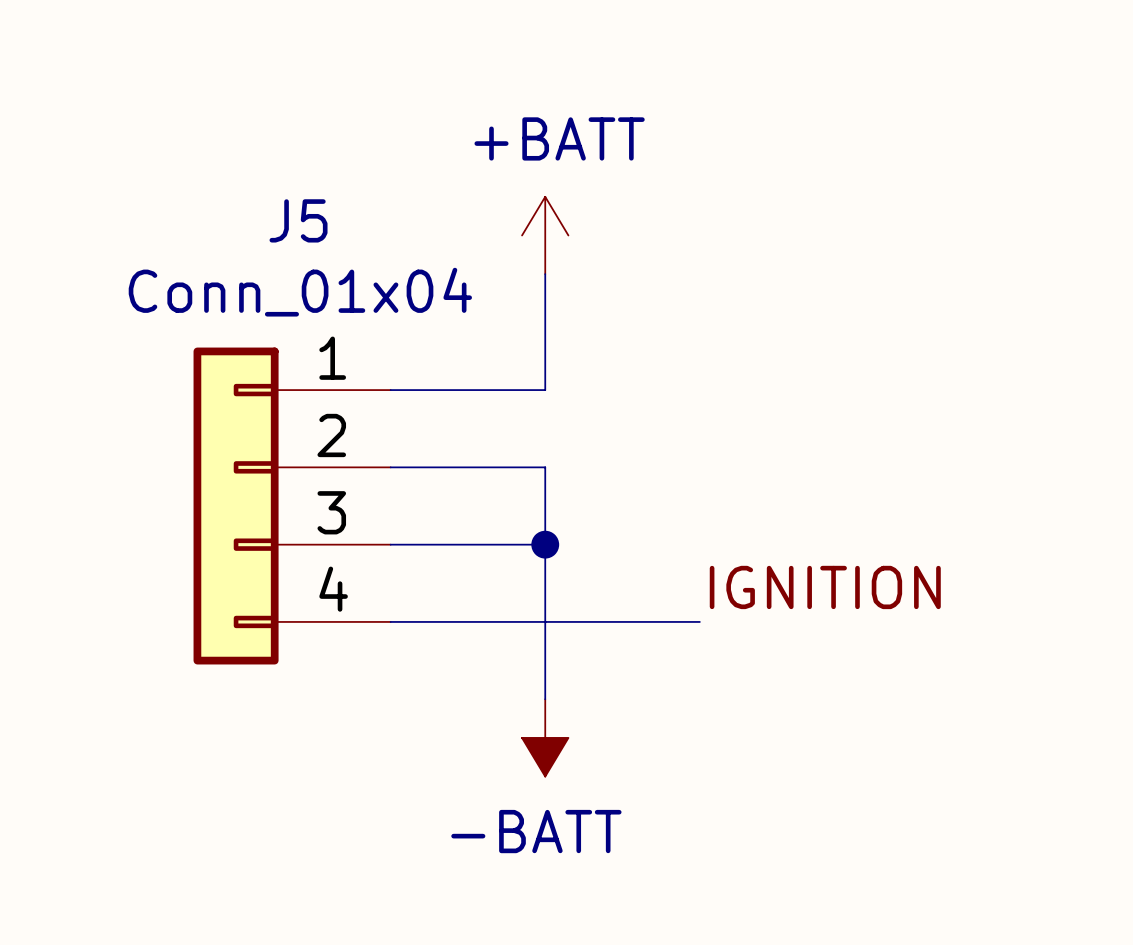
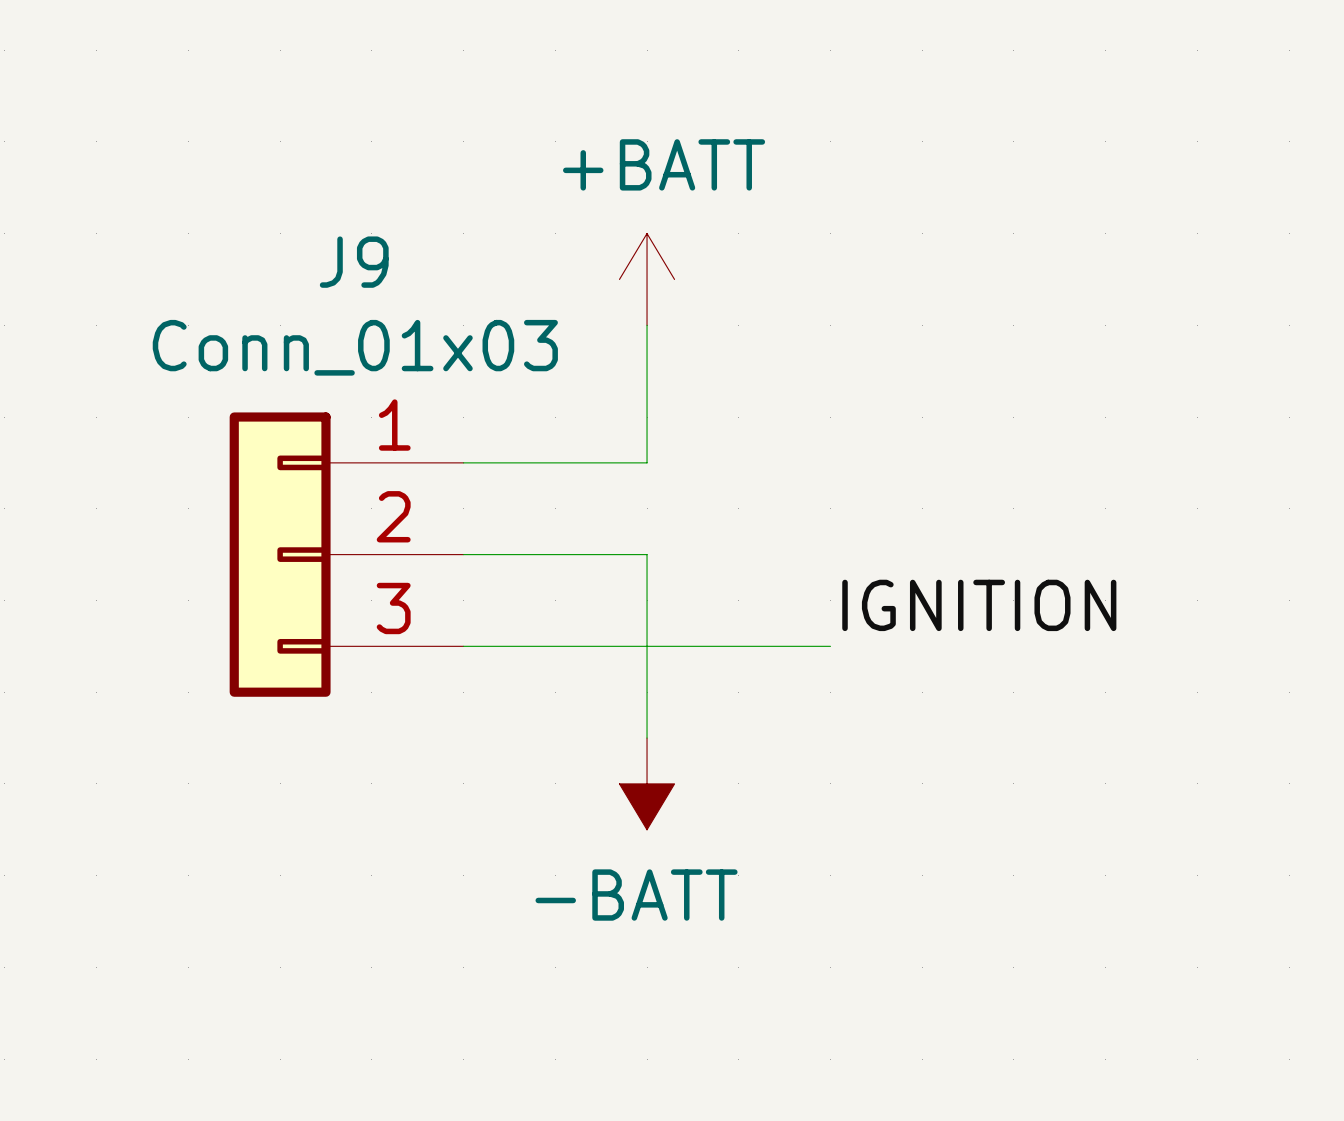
J9: none -> Conn_01x03 (346, 554)
J5: Conn_01x04 (292, 506) -> none
wire: none -> (647, 646) (830, 646)
junction: (545, 544) -> none
label position: IGNITION (825, 587) -> IGNITION (979, 605)
wire: (390, 621) (699, 621) -> none
power symbol position: -BATT (545, 737) -> -BATT (647, 783)

